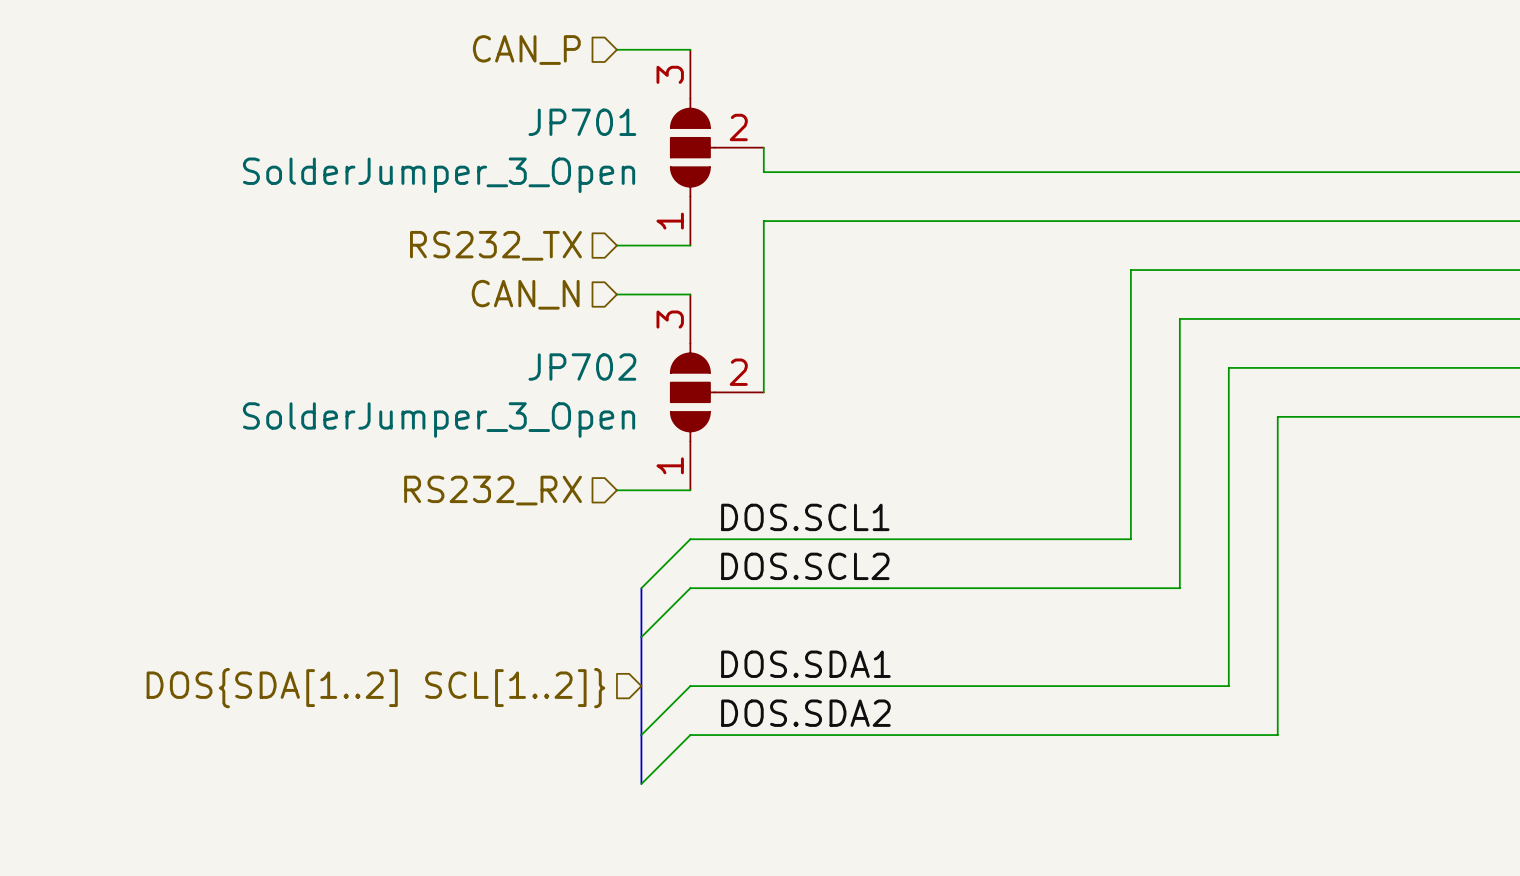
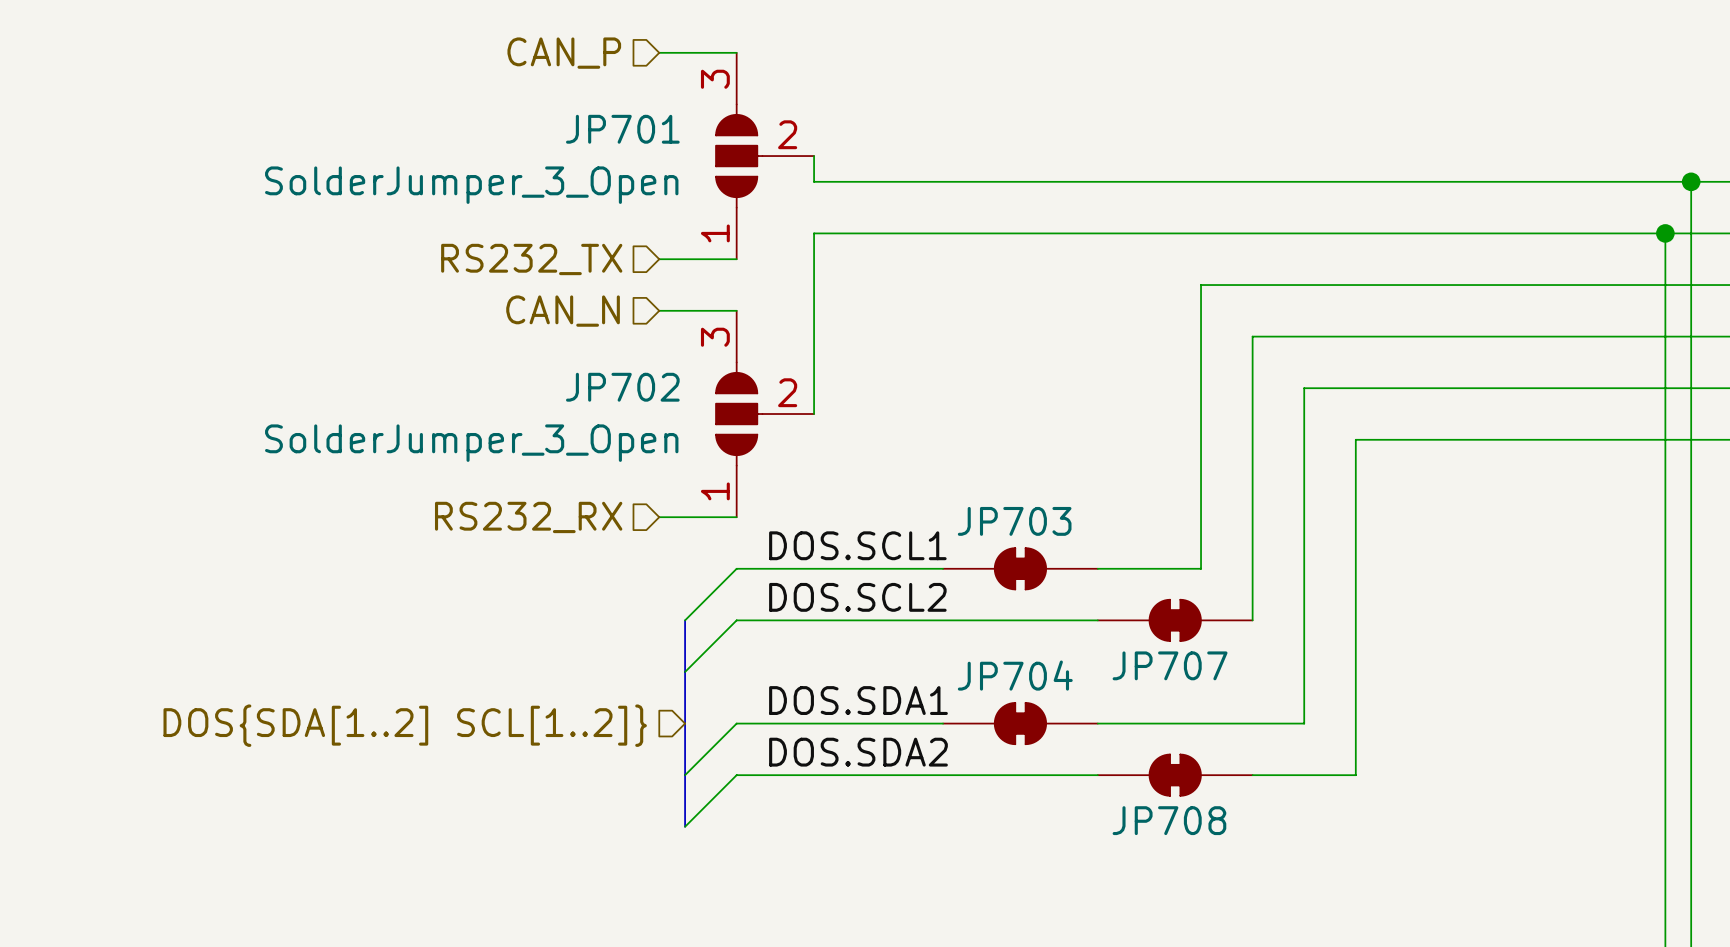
JP703: none -> (1020, 568)
JP707: none -> (1175, 620)
JP704: none -> (1020, 723)
JP708: none -> (1175, 775)

